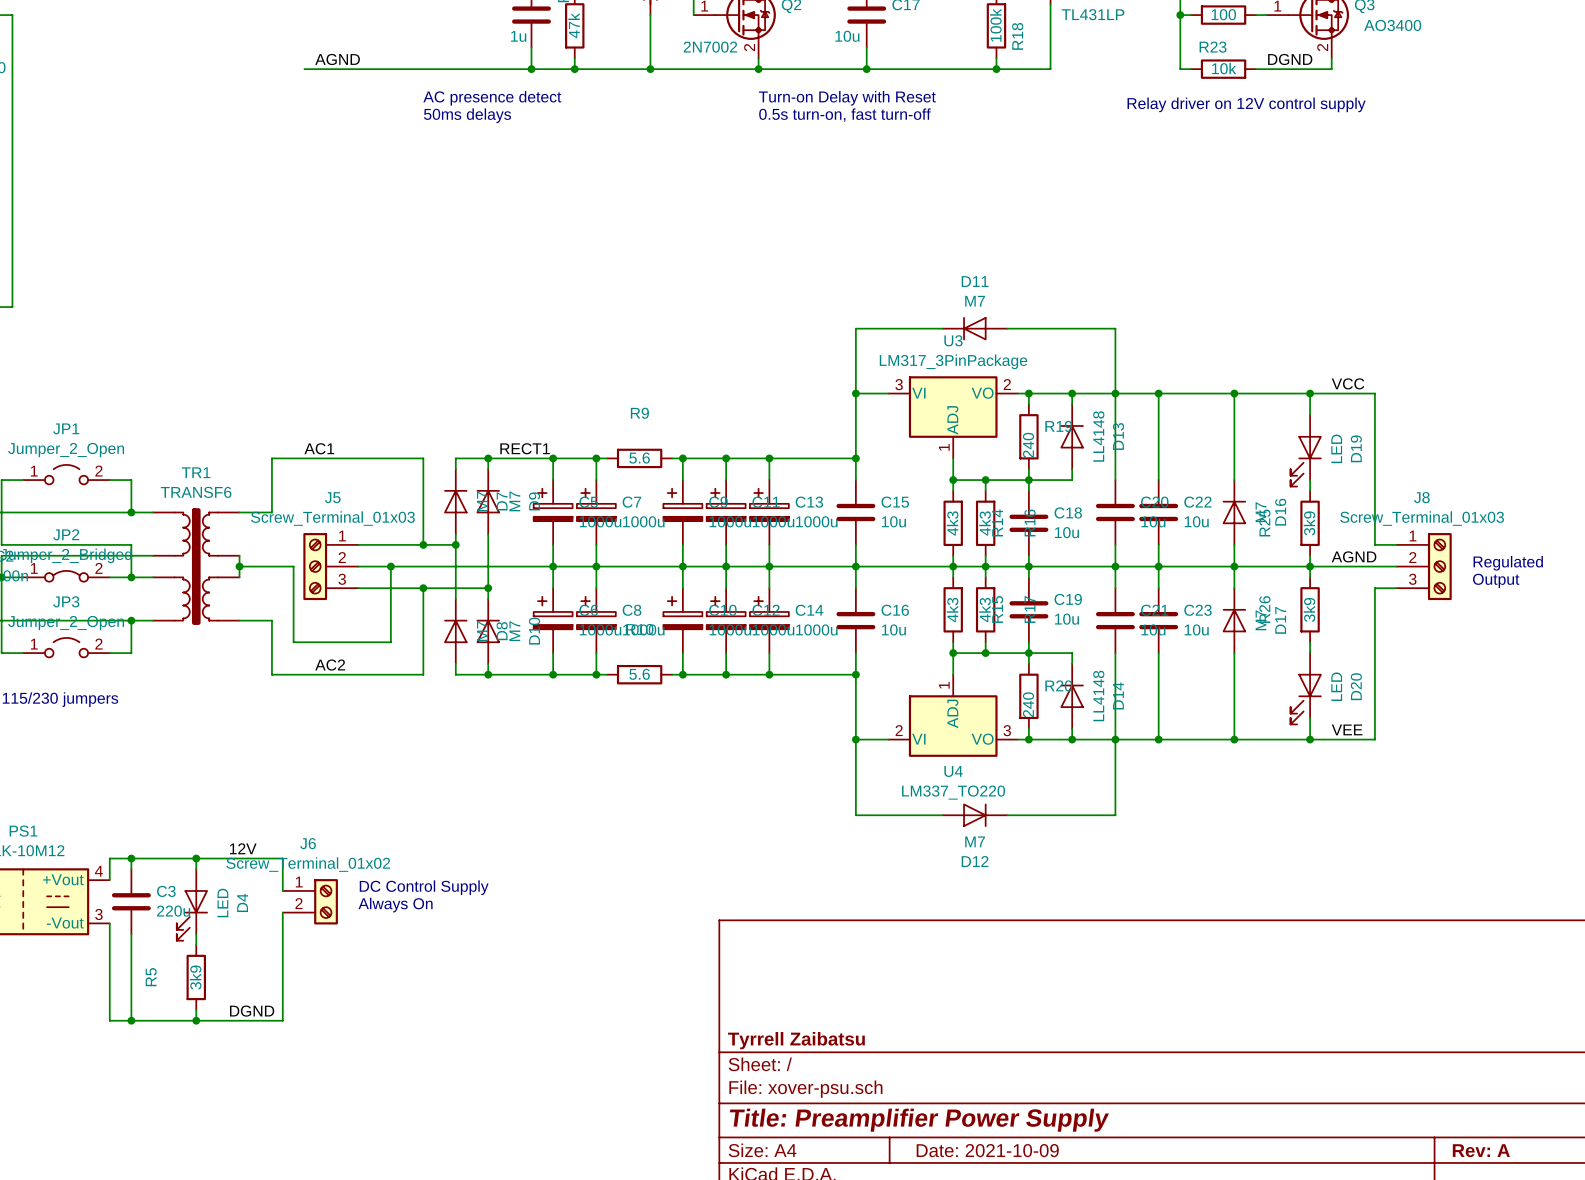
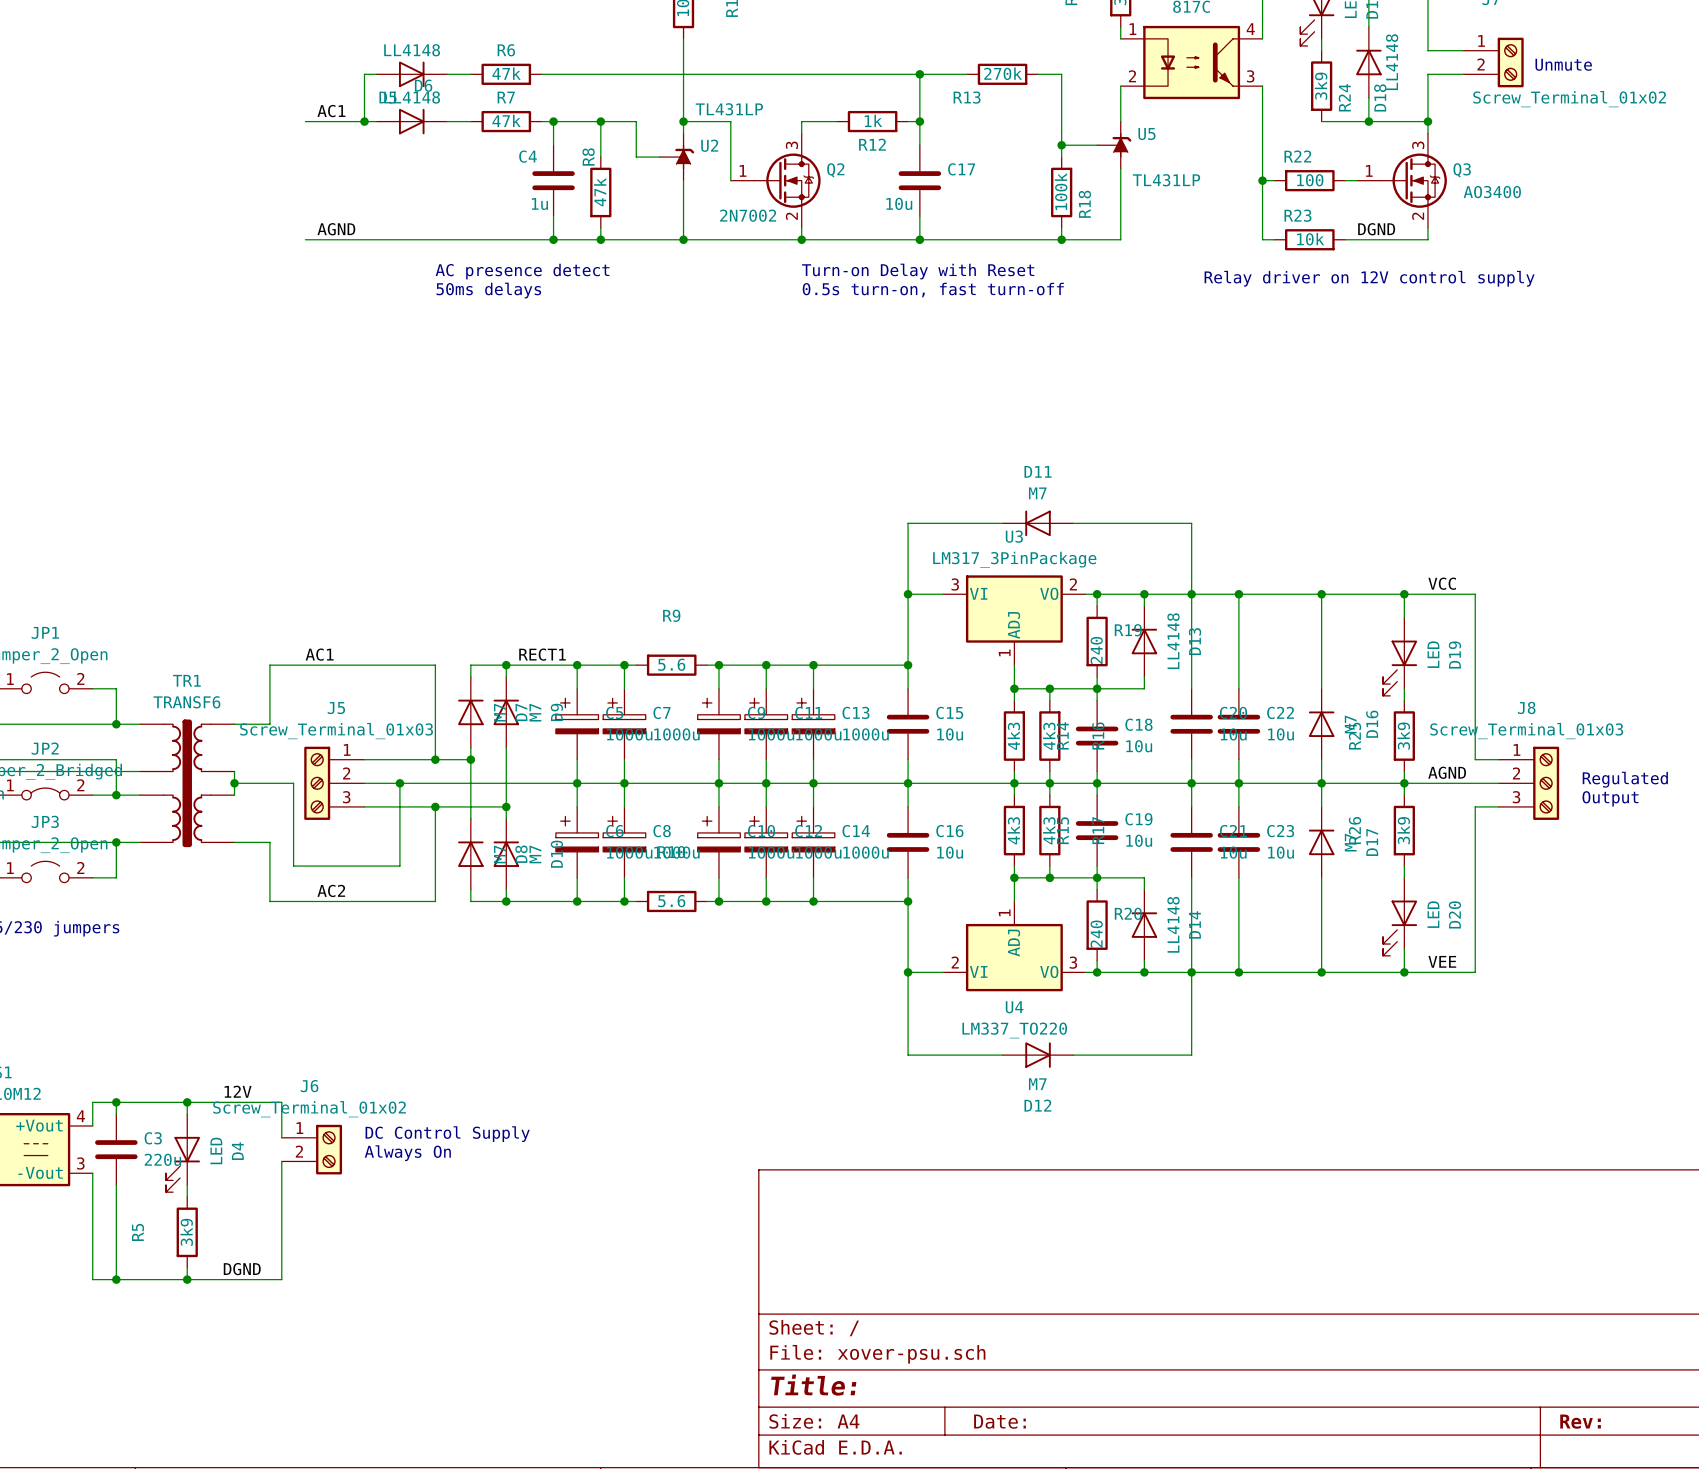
title block: Tyrrell Zaibatsu (796, 1040) -> none
title block: Title: Preamplifier Power Supply (919, 1120) -> Title: (813, 1385)
title block: Date: 2021-10-09 (987, 1150) -> Date: (999, 1421)
title block: Rev: A (1481, 1150) -> Rev: (1580, 1421)

